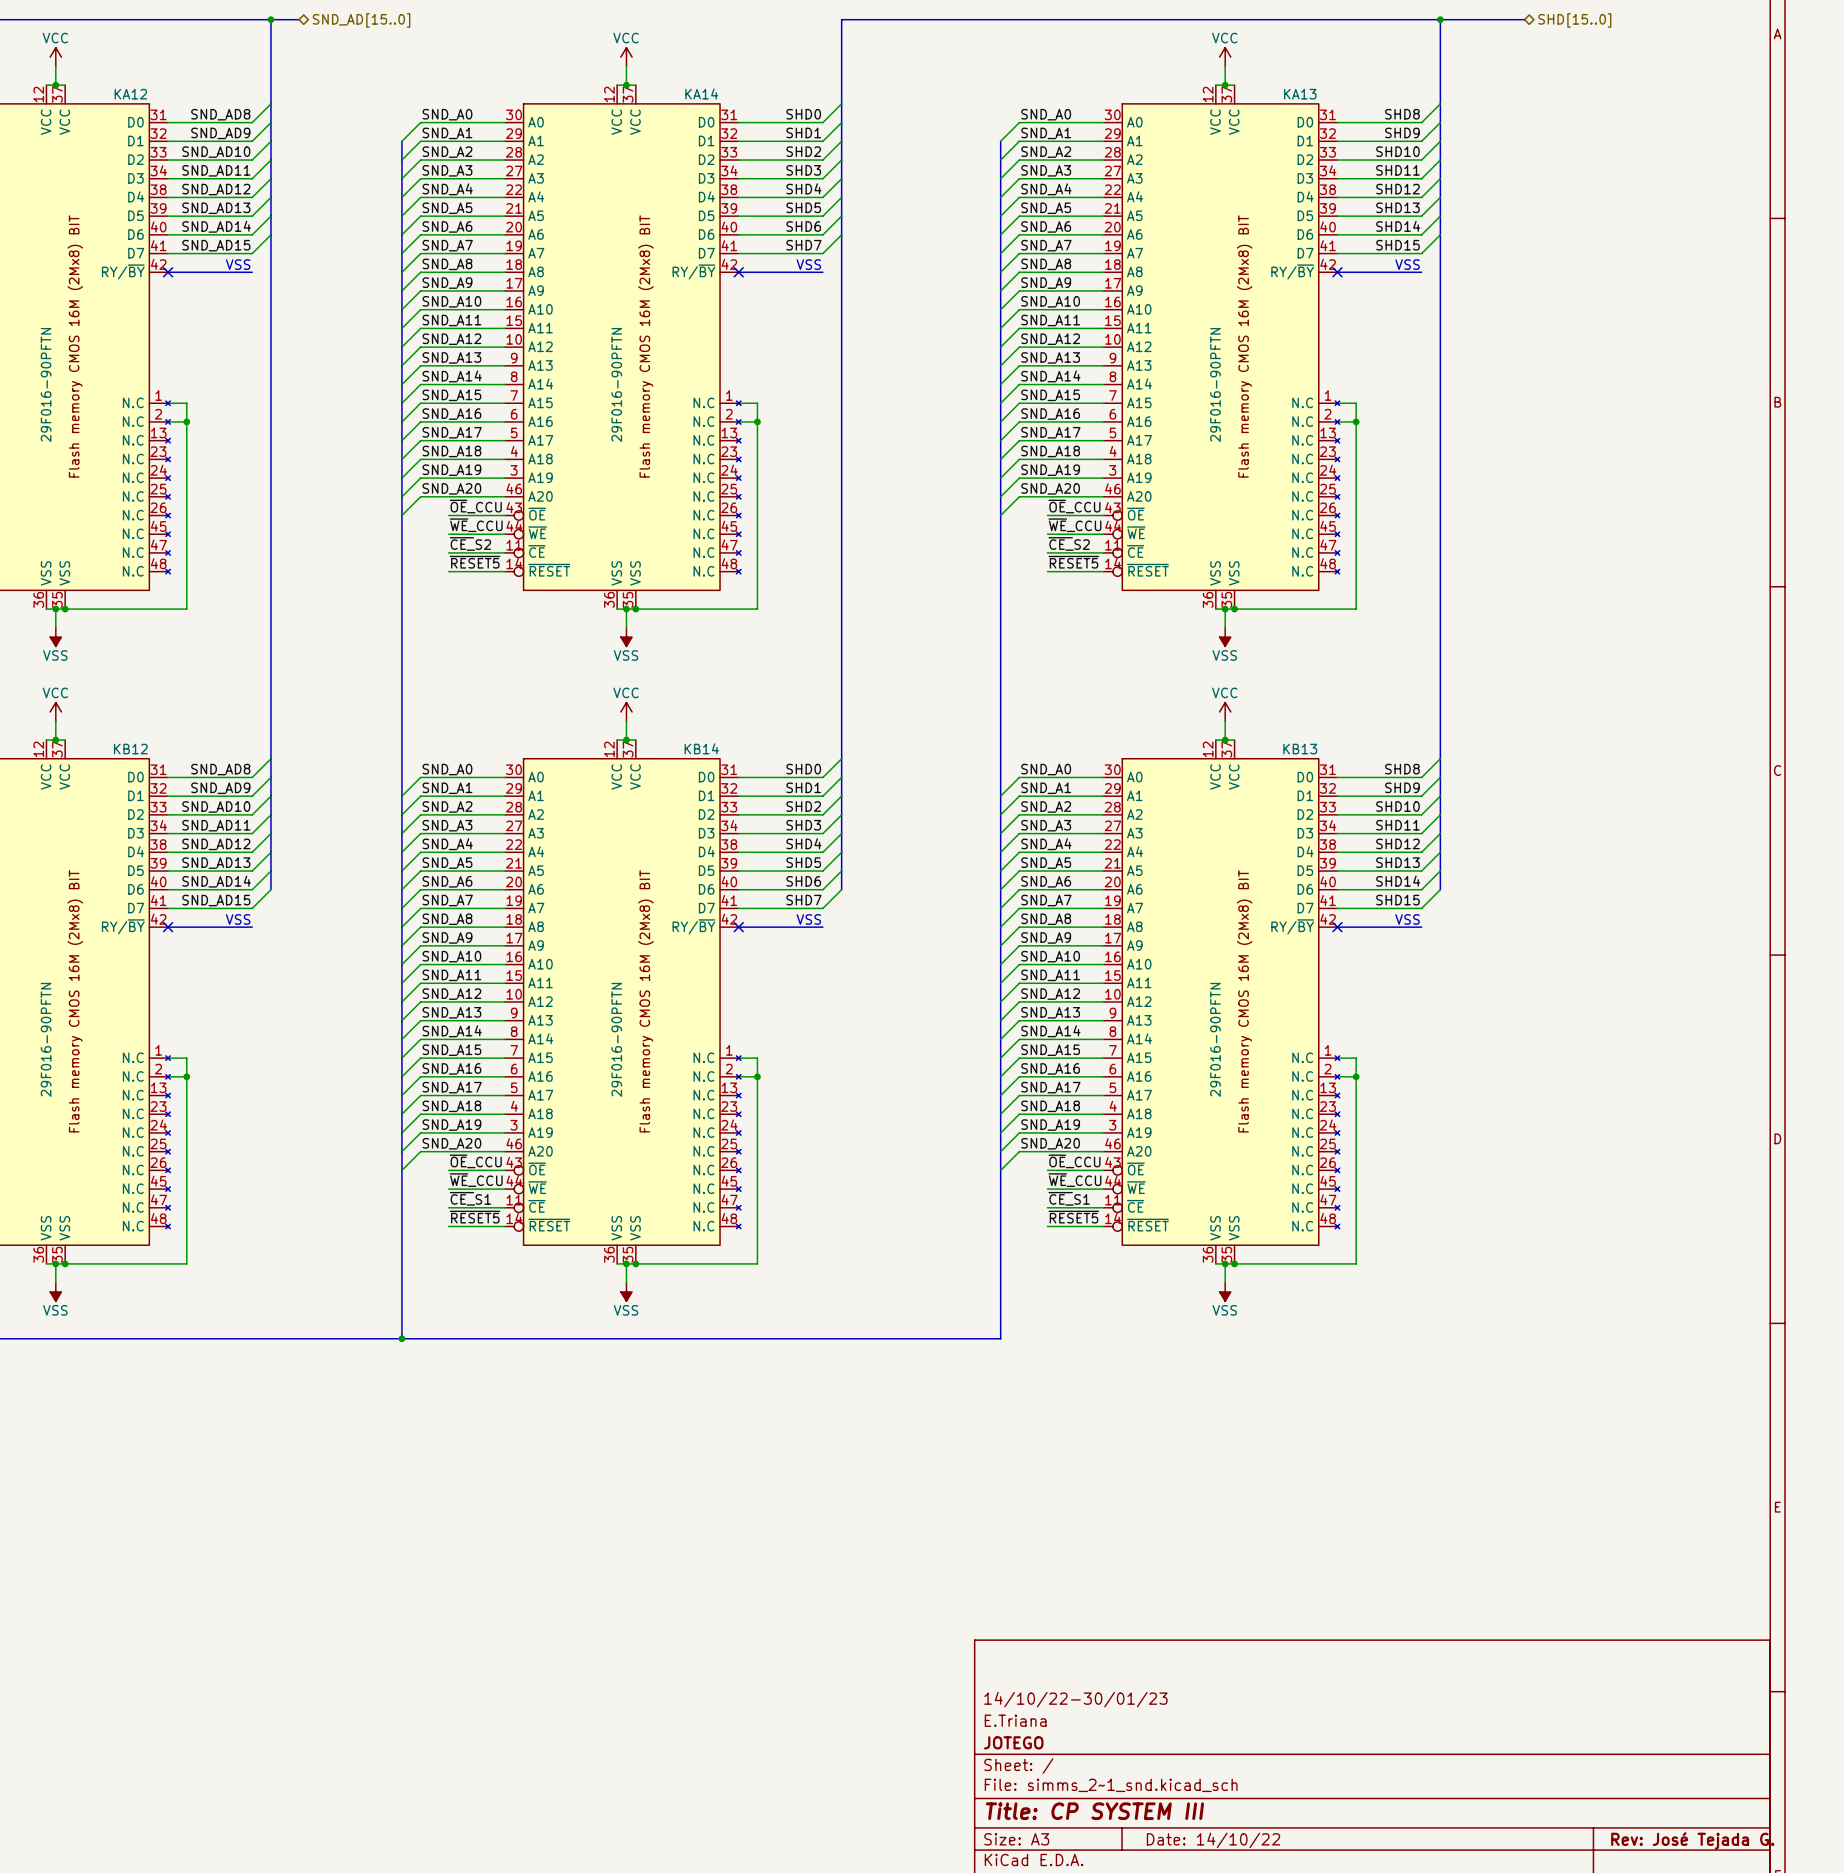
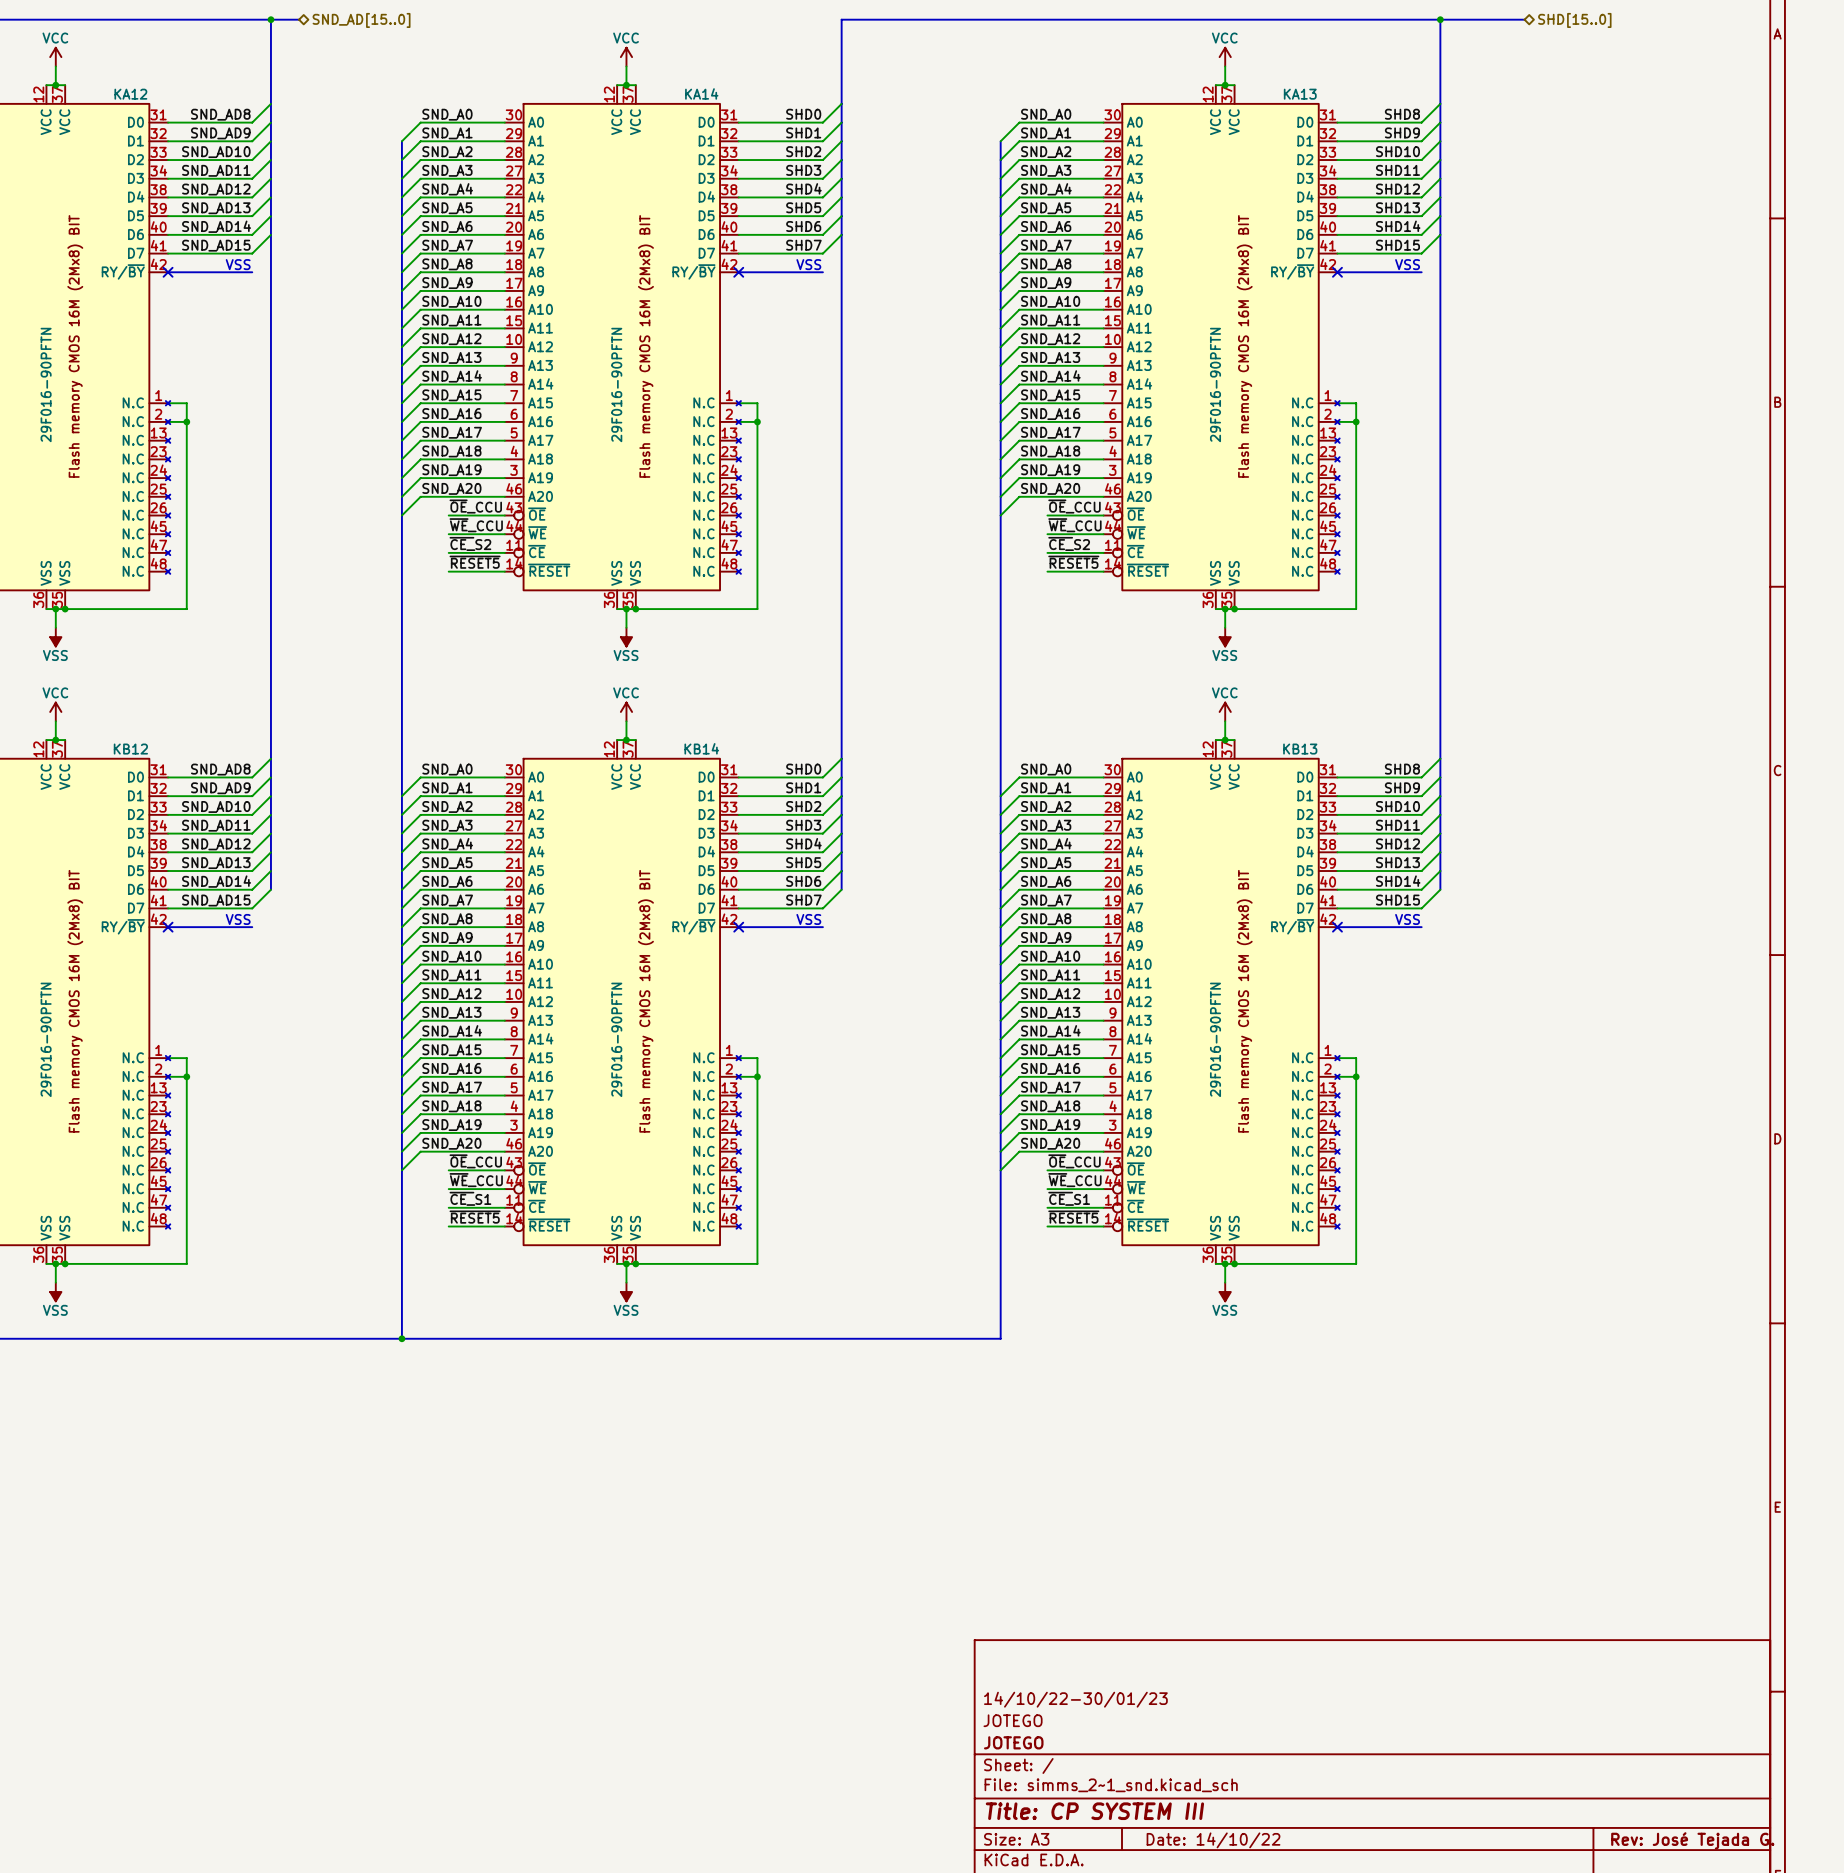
title block: E.Triana (1015, 1720) -> JOTEGO (1013, 1720)

